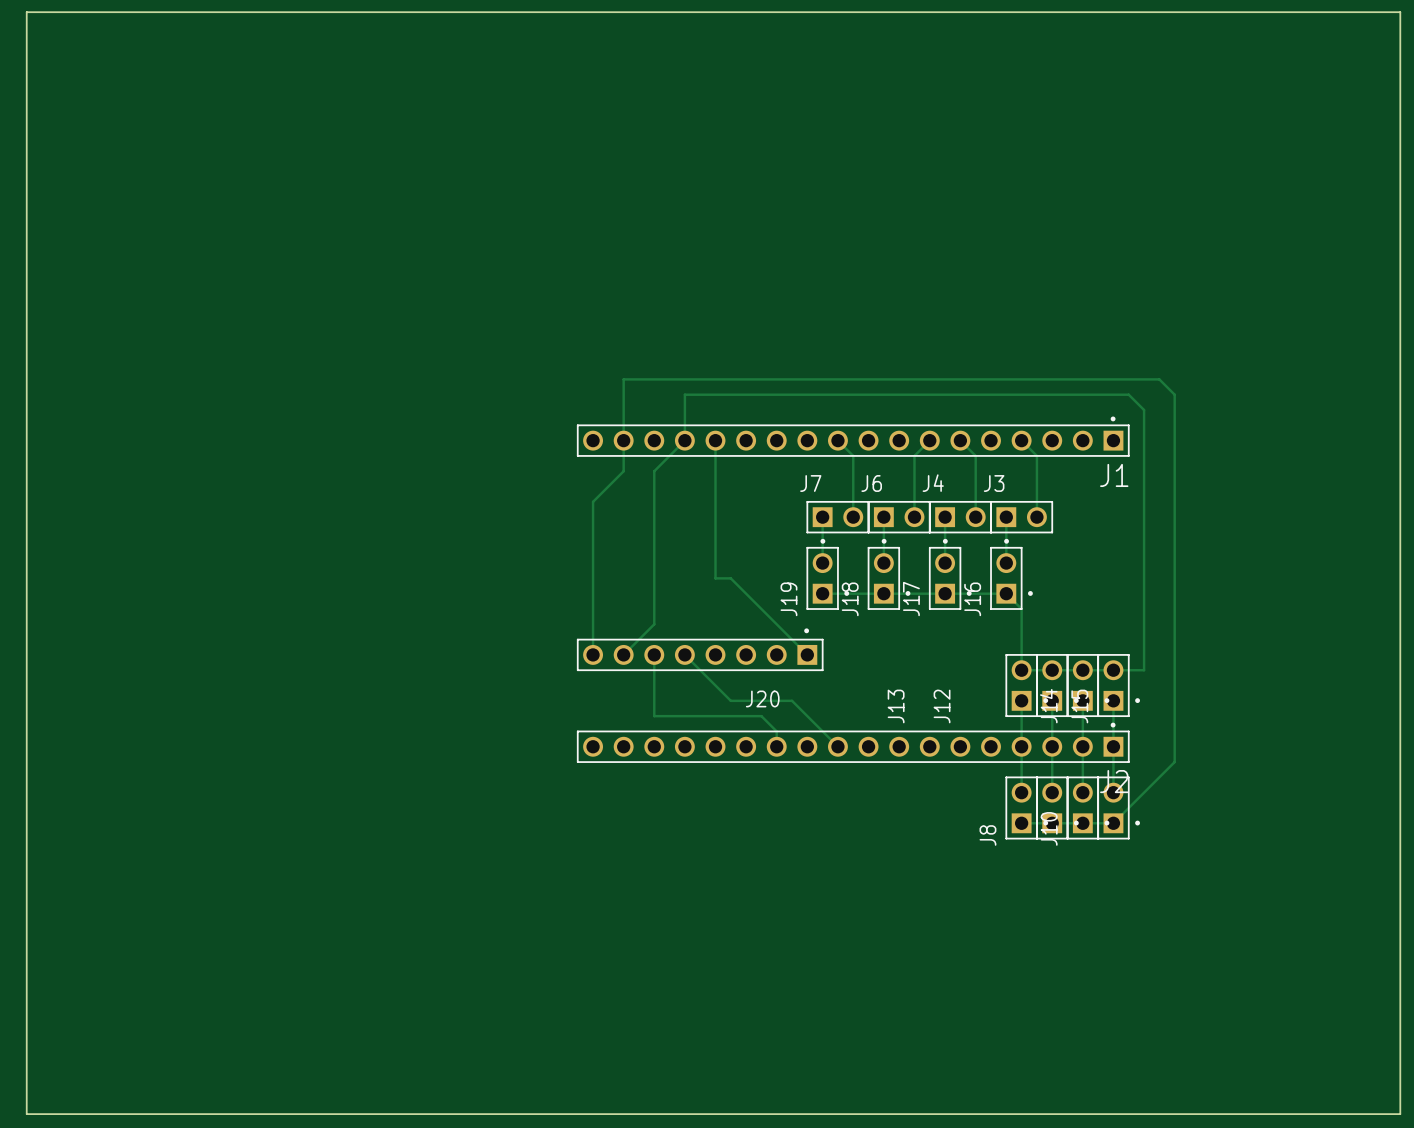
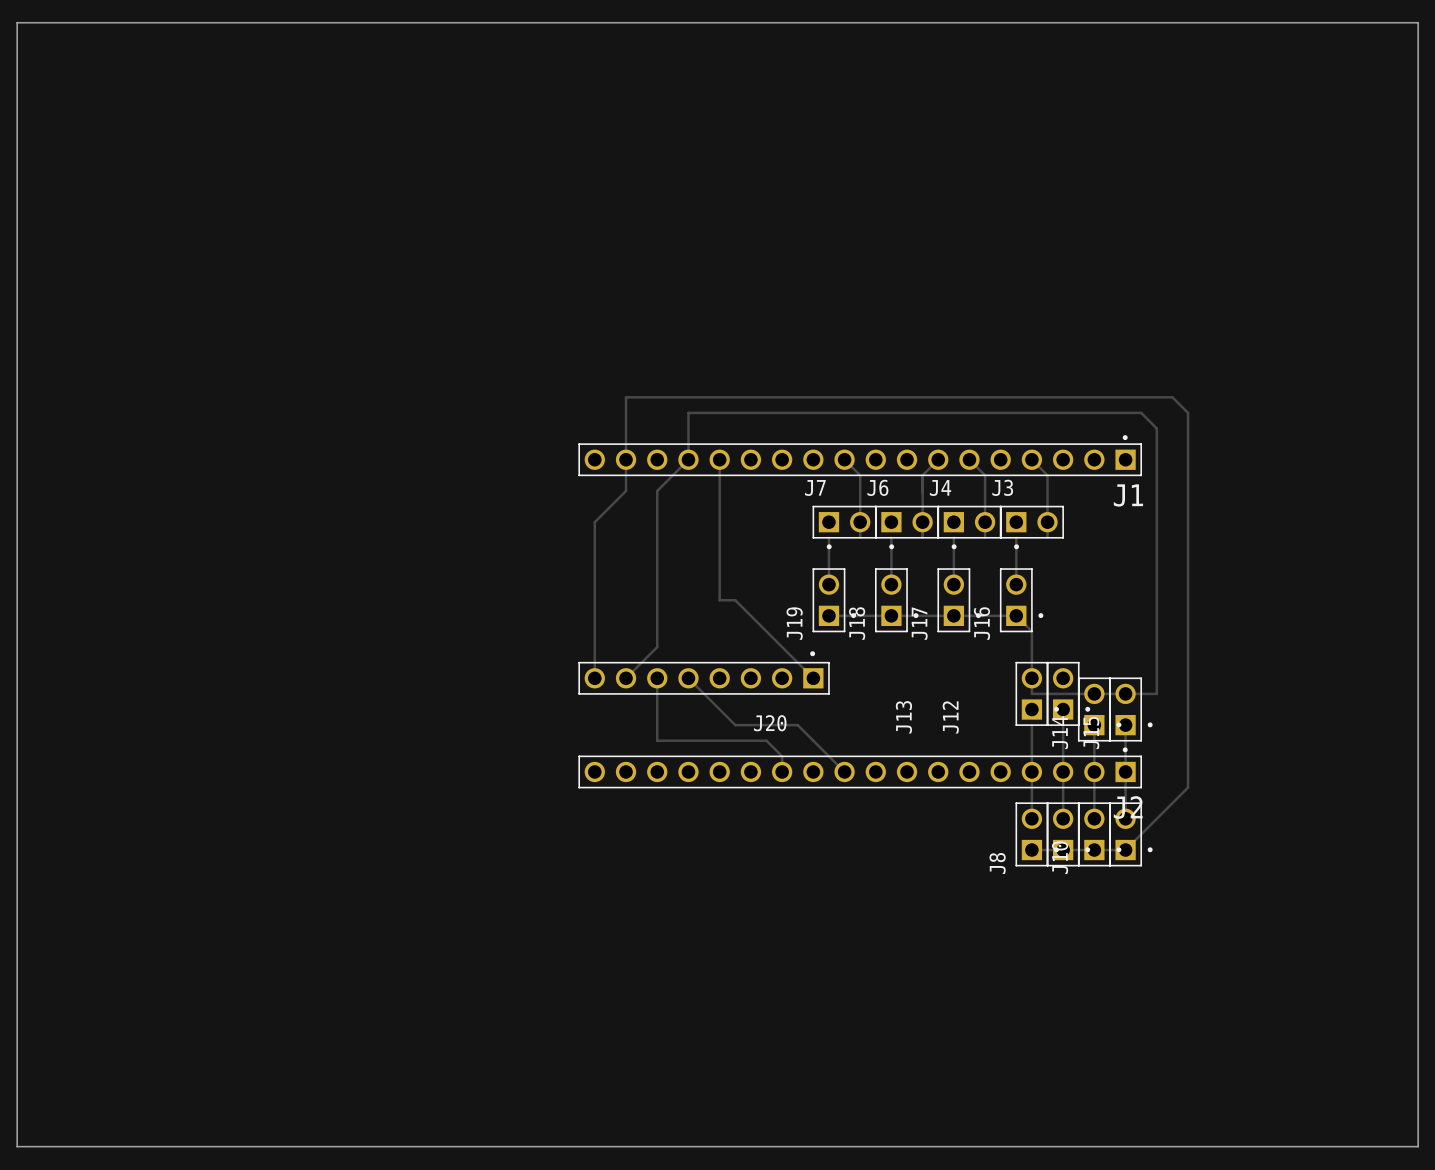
J7 position: (837, 522) -> (844, 527)
J6 position: (899, 522) -> (907, 527)
J4 position: (960, 522) -> (969, 527)
J3 position: (1021, 522) -> (1031, 527)
J12 position: (1026, 685) -> (1037, 693)
J13 position: (1057, 685) -> (1068, 693)

